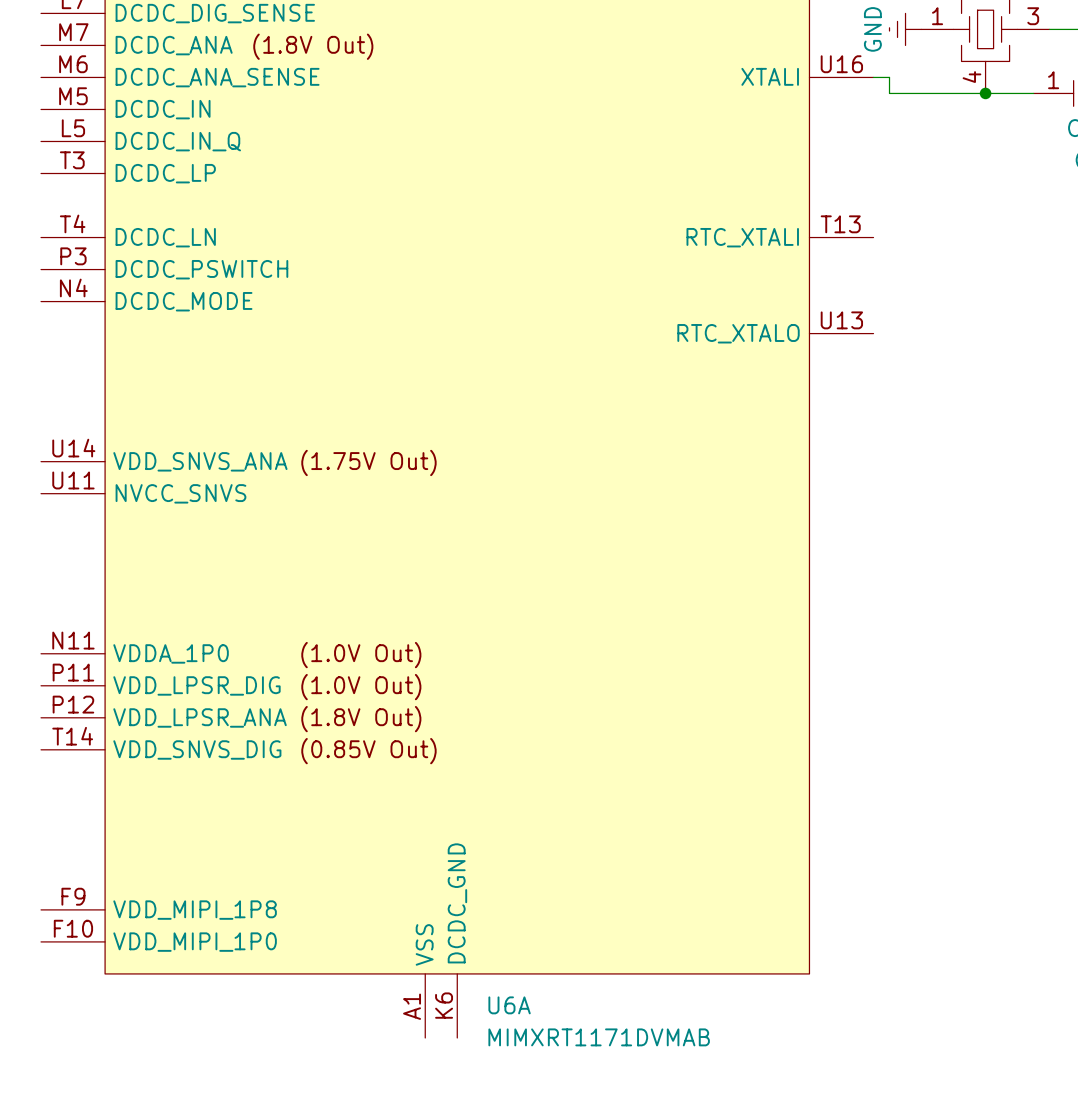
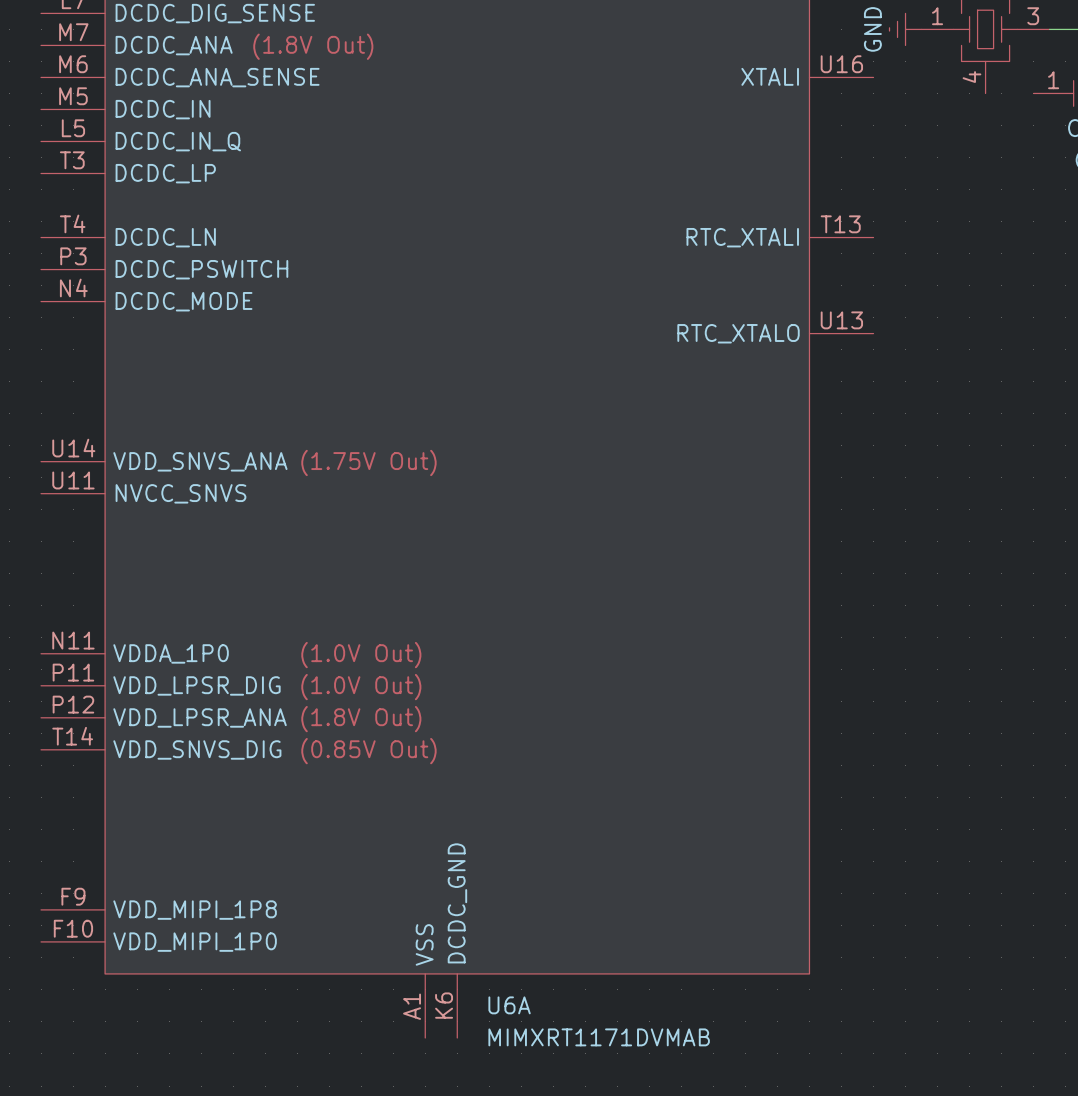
wire: (873, 77) (889, 77) (889, 93) (1033, 93) -> none
junction: (985, 93) -> none

